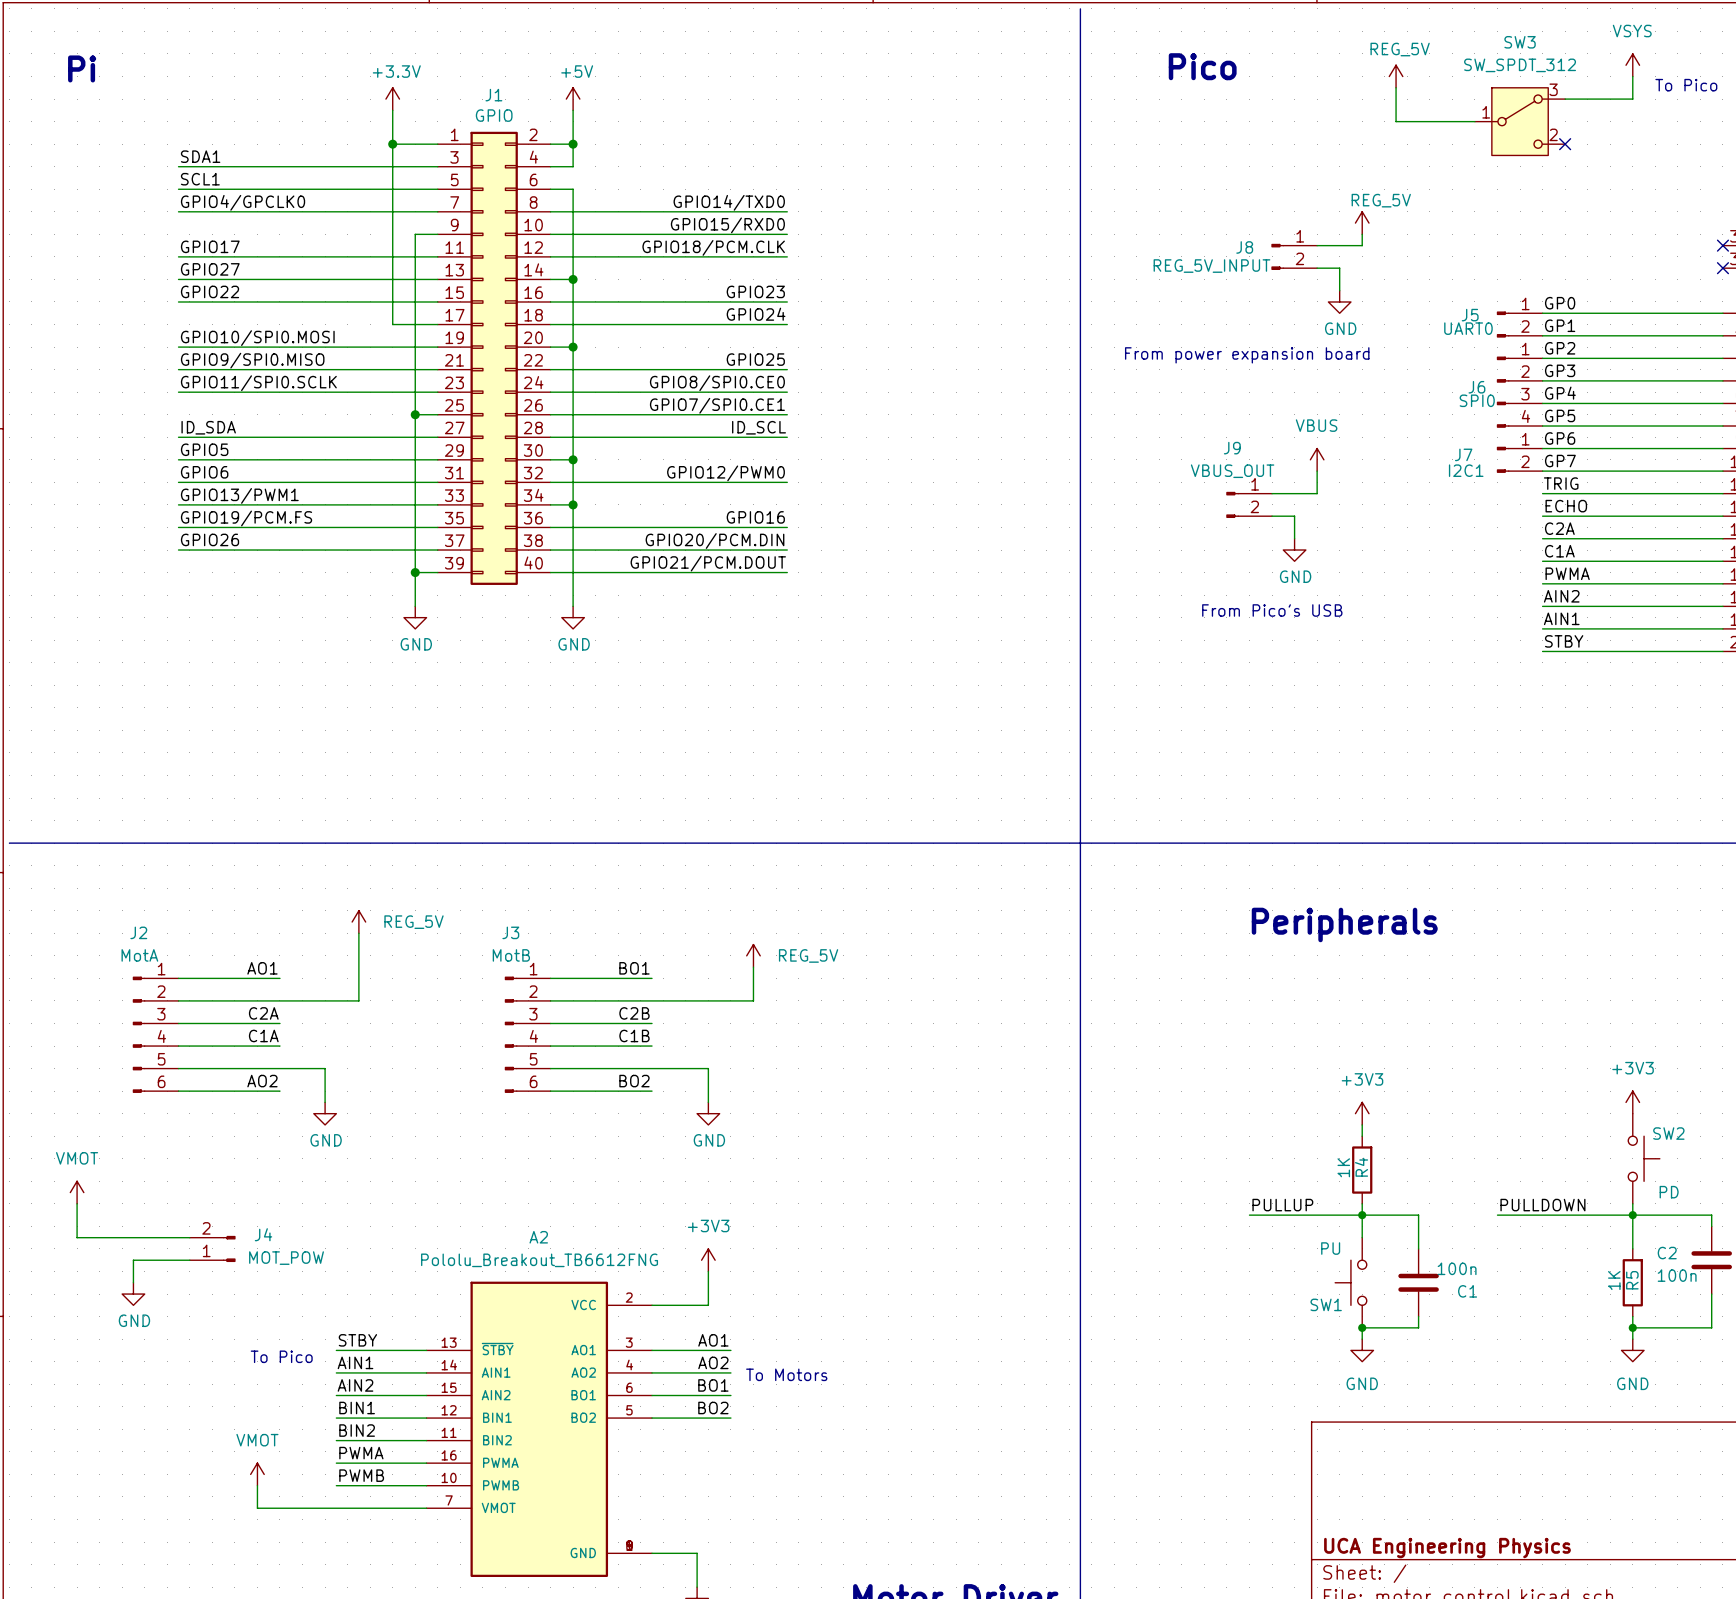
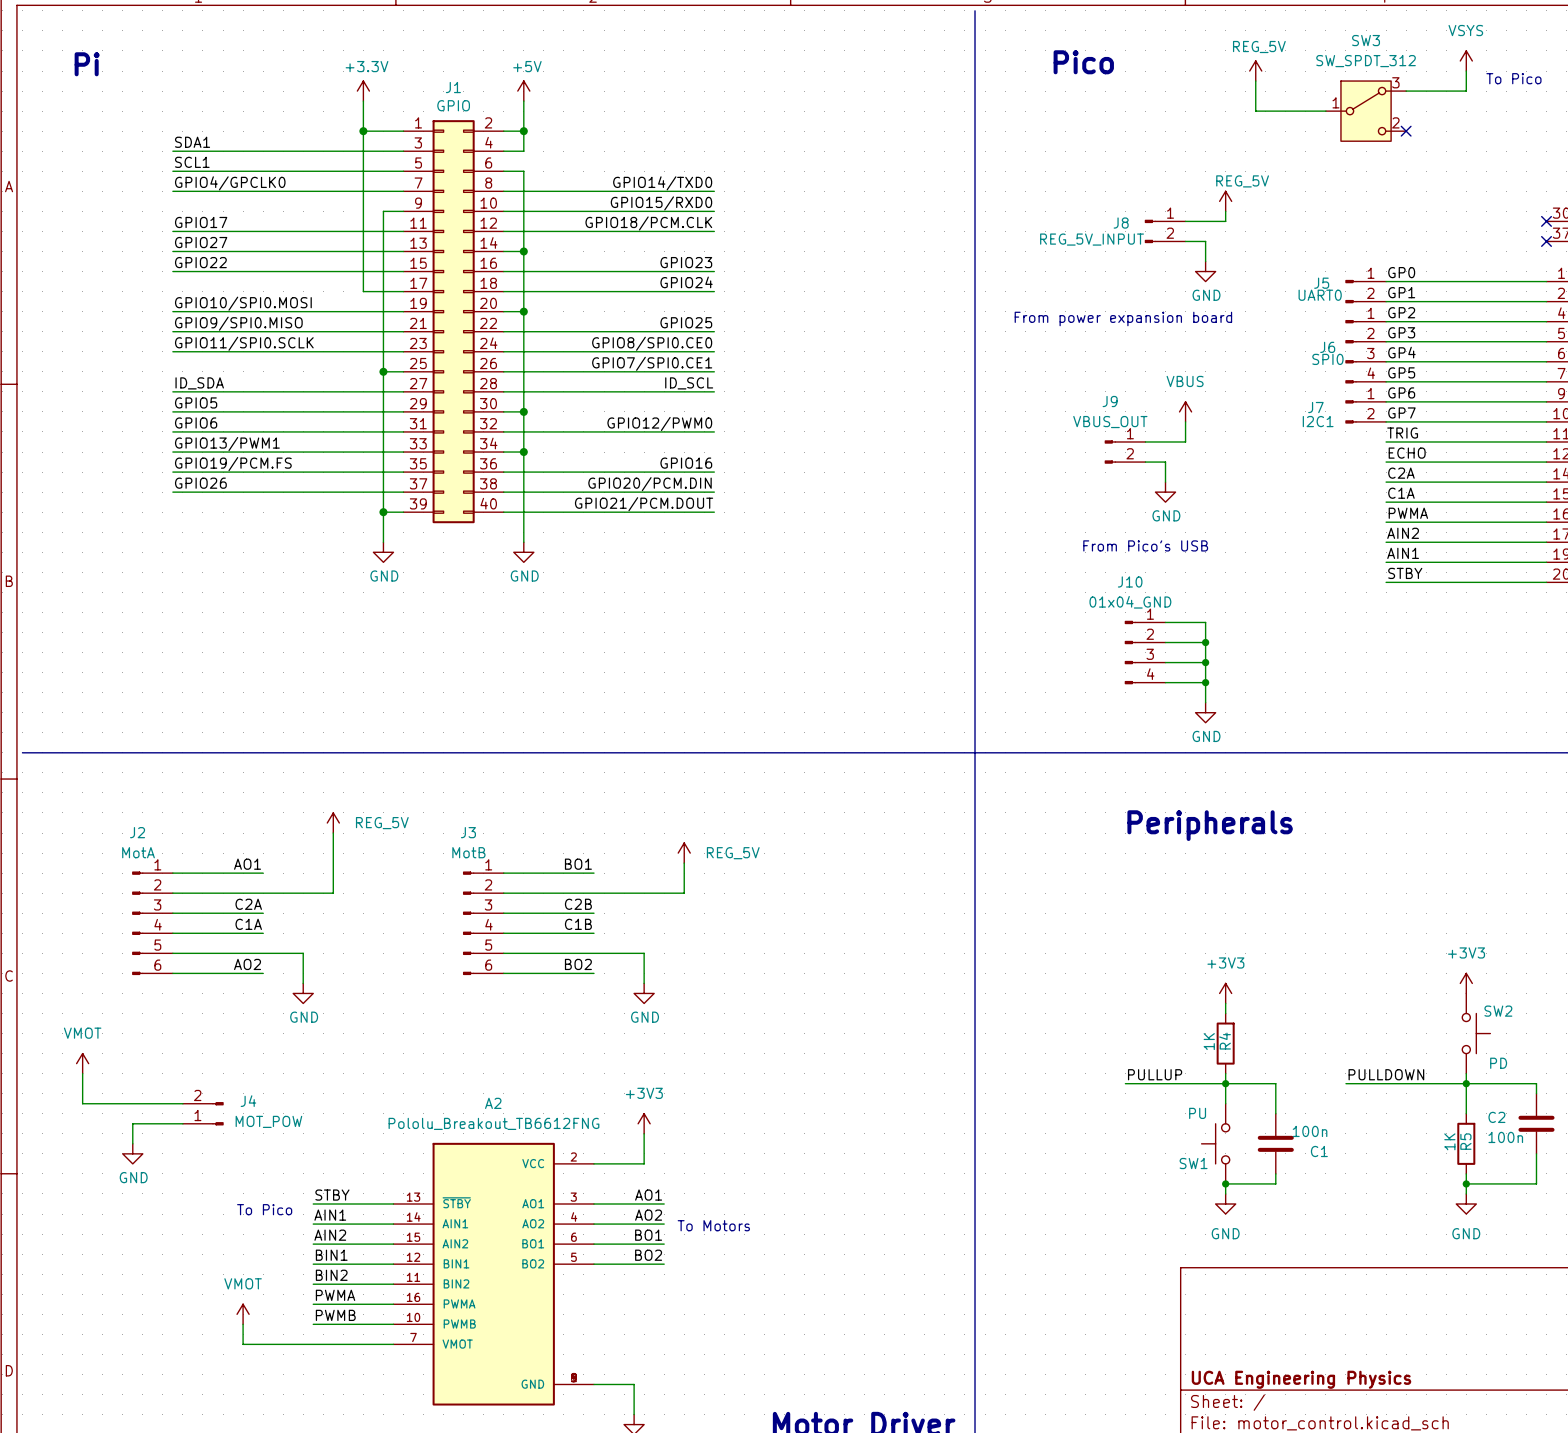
wire: none -> (1165, 622) (1205, 622) (1205, 702)
wire: none -> (1165, 642) (1205, 642)
junction: none -> (1205, 642)
J10: none -> 01x04_GND (1145, 652)
wire: none -> (1165, 662) (1205, 662)
junction: none -> (1205, 662)
wire: none -> (1165, 682) (1205, 682)
junction: none -> (1205, 682)
power symbol: none -> GND (1205, 712)

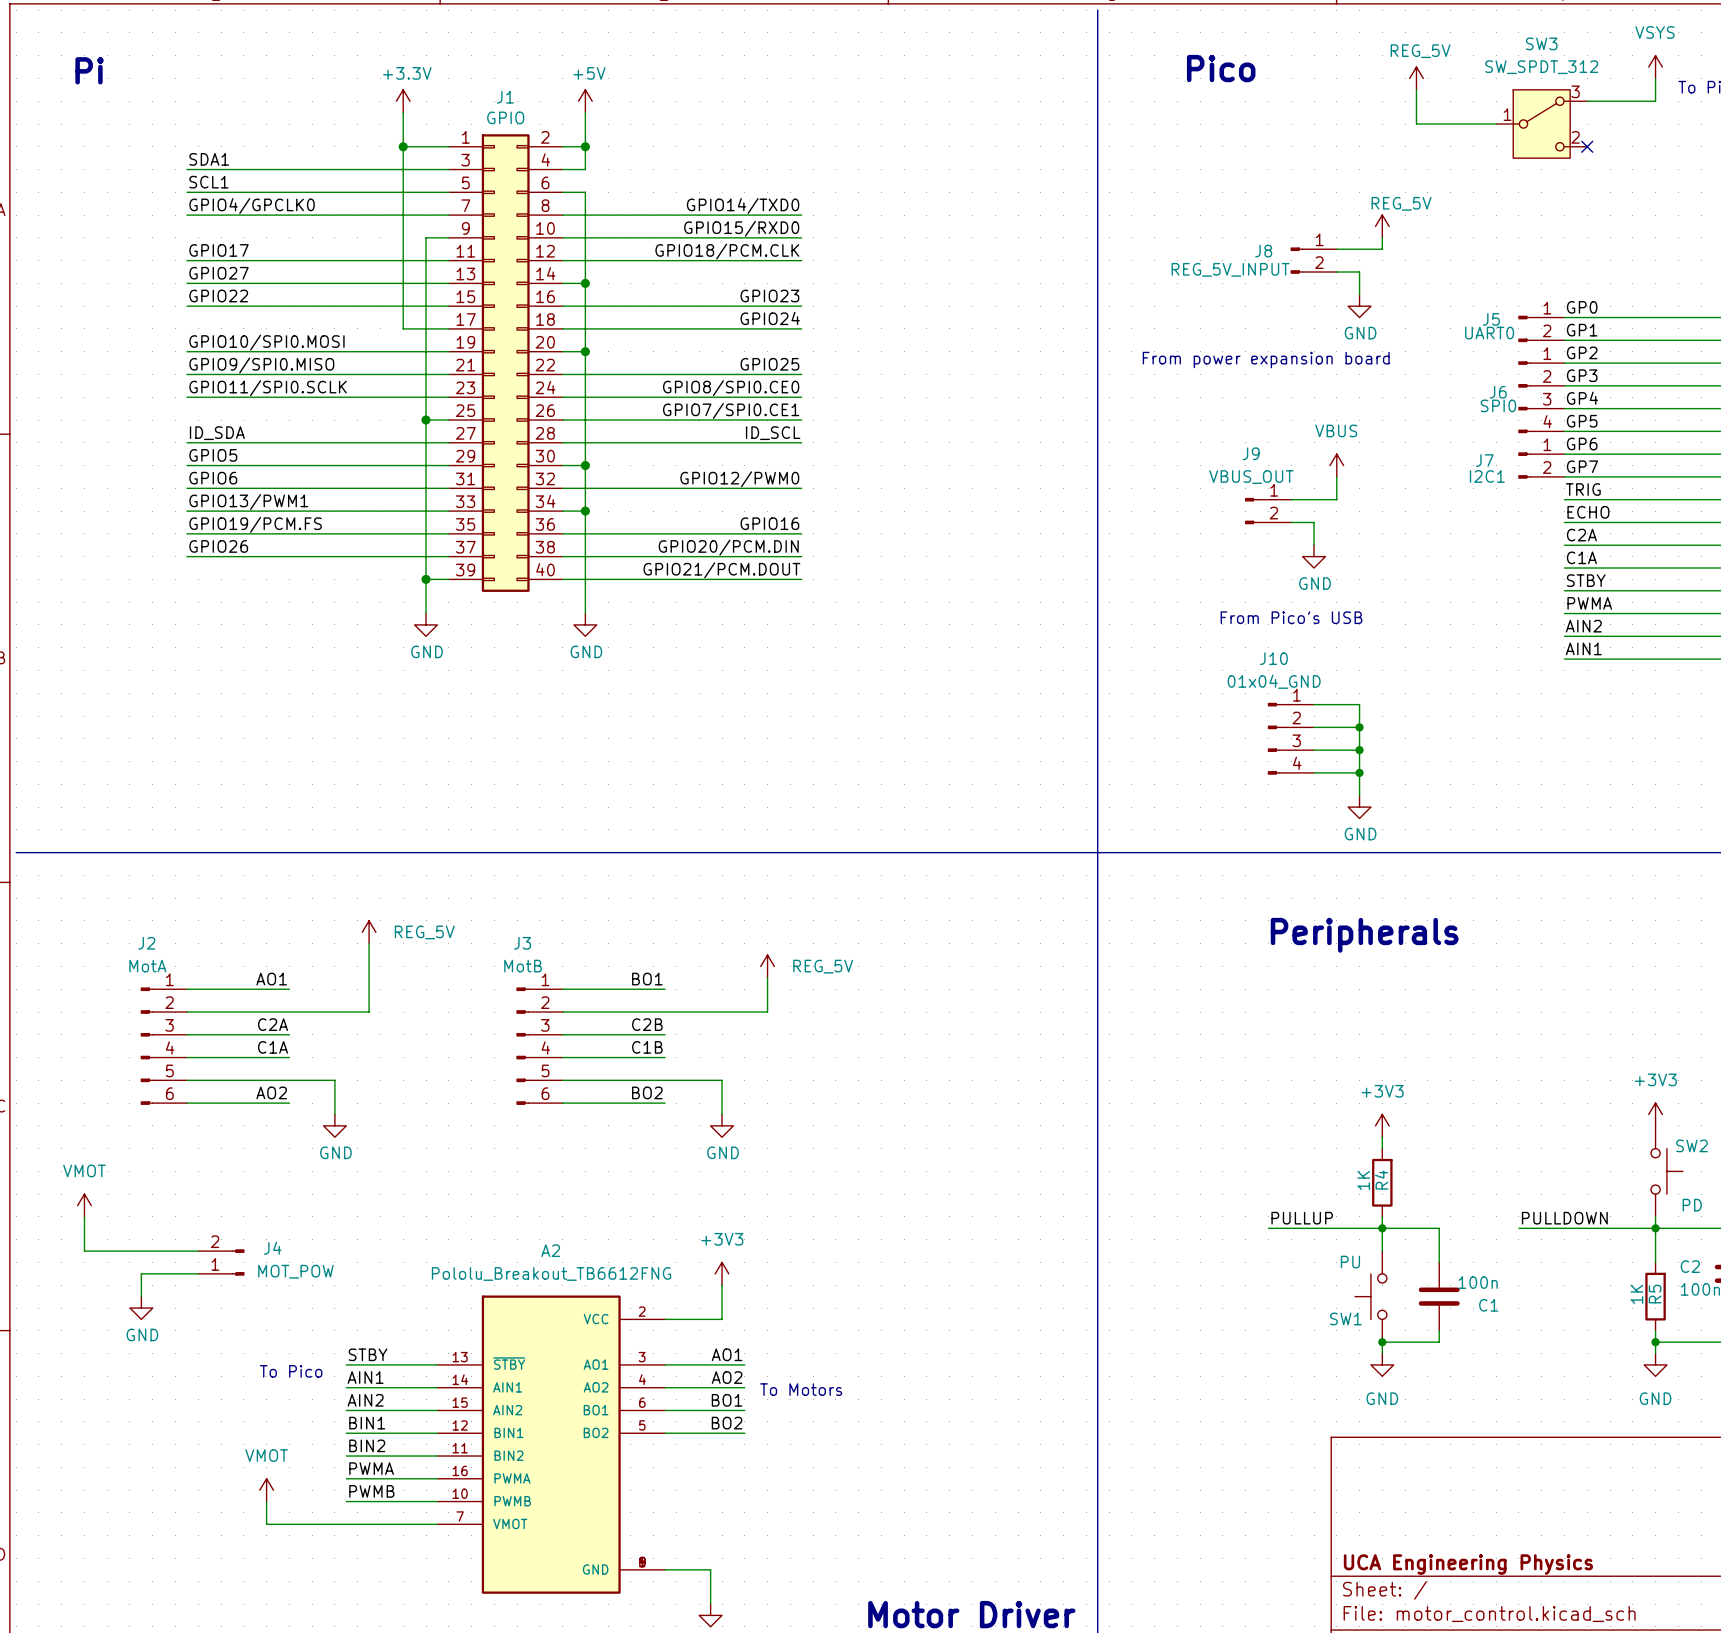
label: PWMA (1408, 513) -> STBY (1586, 580)
label: AIN2 (1403, 533) -> PWMA (1589, 603)
label: AIN1 (1403, 553) -> AIN2 (1583, 626)
label: STBY (1405, 573) -> AIN1 (1583, 648)

